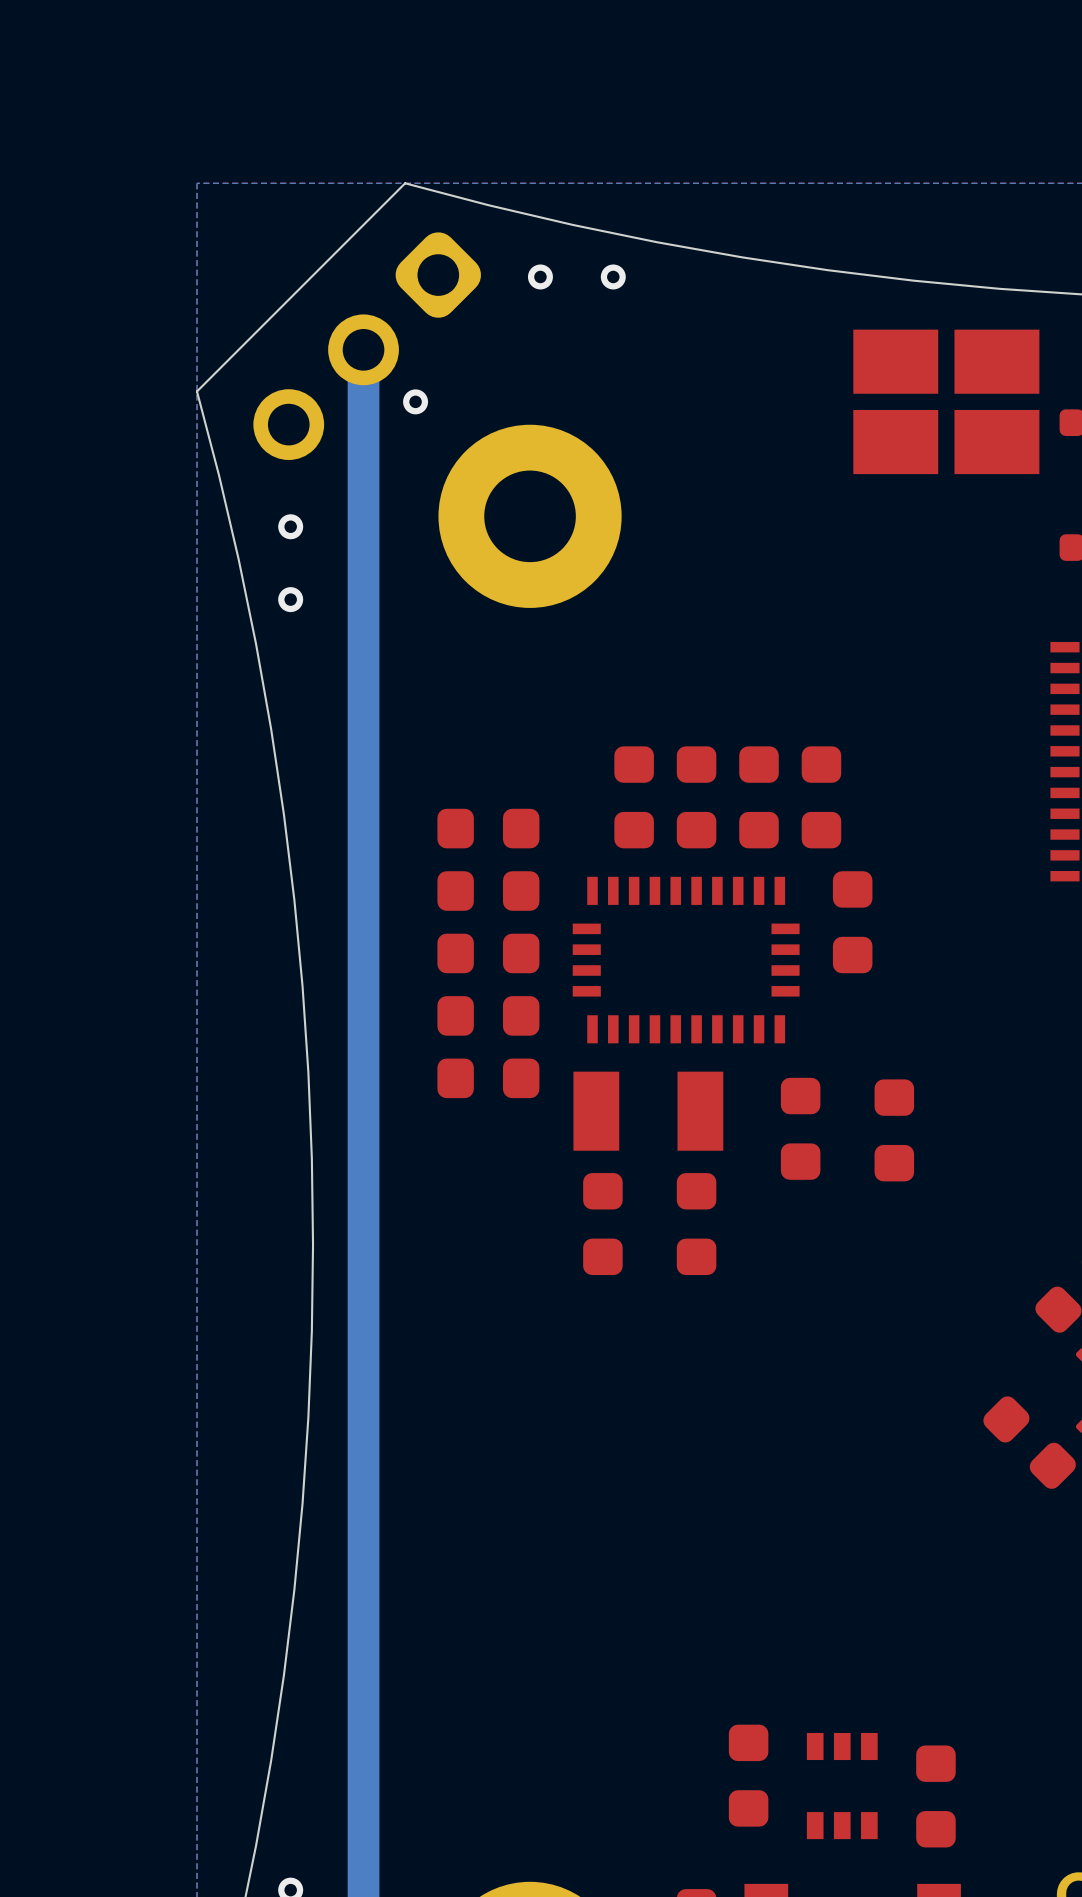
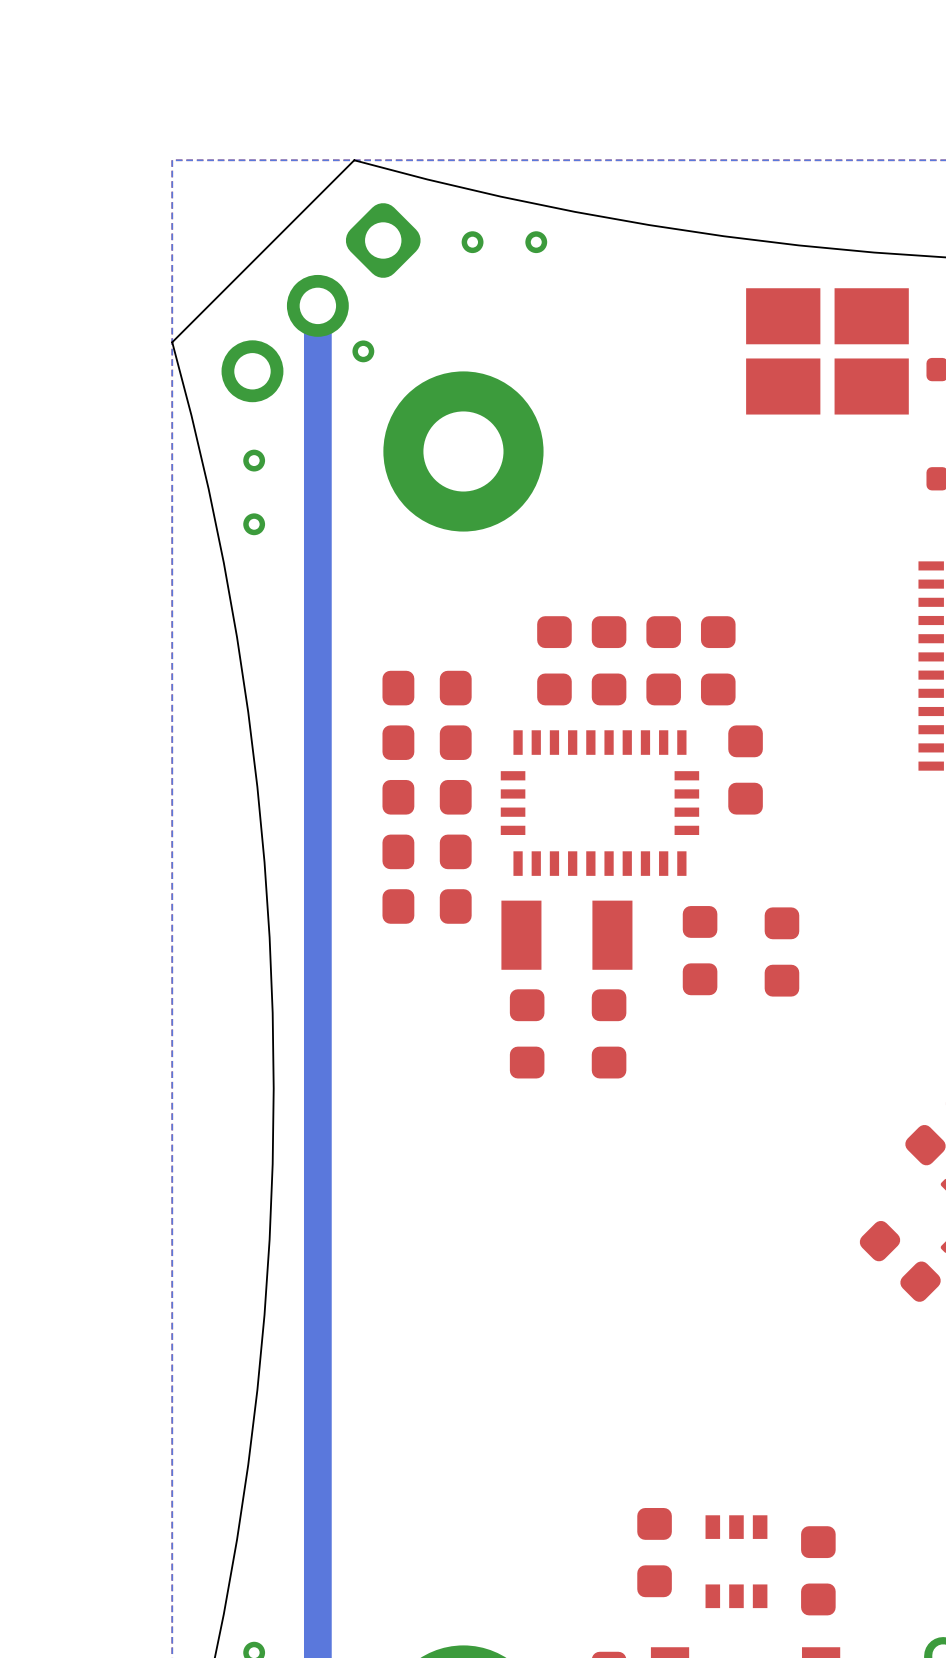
part: none -> (554, 660)
part: none -> (609, 660)
part: none -> (663, 660)
part: none -> (718, 660)
part: none -> (427, 688)
part: (634, 797) -> none
part: (696, 797) -> none
part: (759, 797) -> none
part: (821, 797) -> none
part: (488, 828) -> none
part: none -> (427, 742)
part: (488, 891) -> none
part: none -> (427, 797)
part position: (852, 922) -> (745, 769)
part: (488, 953) -> none
part position: (686, 960) -> (599, 803)
part: none -> (427, 851)
part: (488, 1015) -> none
part: none -> (427, 906)
part: (488, 1078) -> none
part position: (648, 1111) -> (566, 935)
part position: (800, 1128) -> (700, 950)
part position: (894, 1130) -> (781, 951)
part position: (602, 1224) -> (527, 1033)
part position: (696, 1224) -> (609, 1033)

